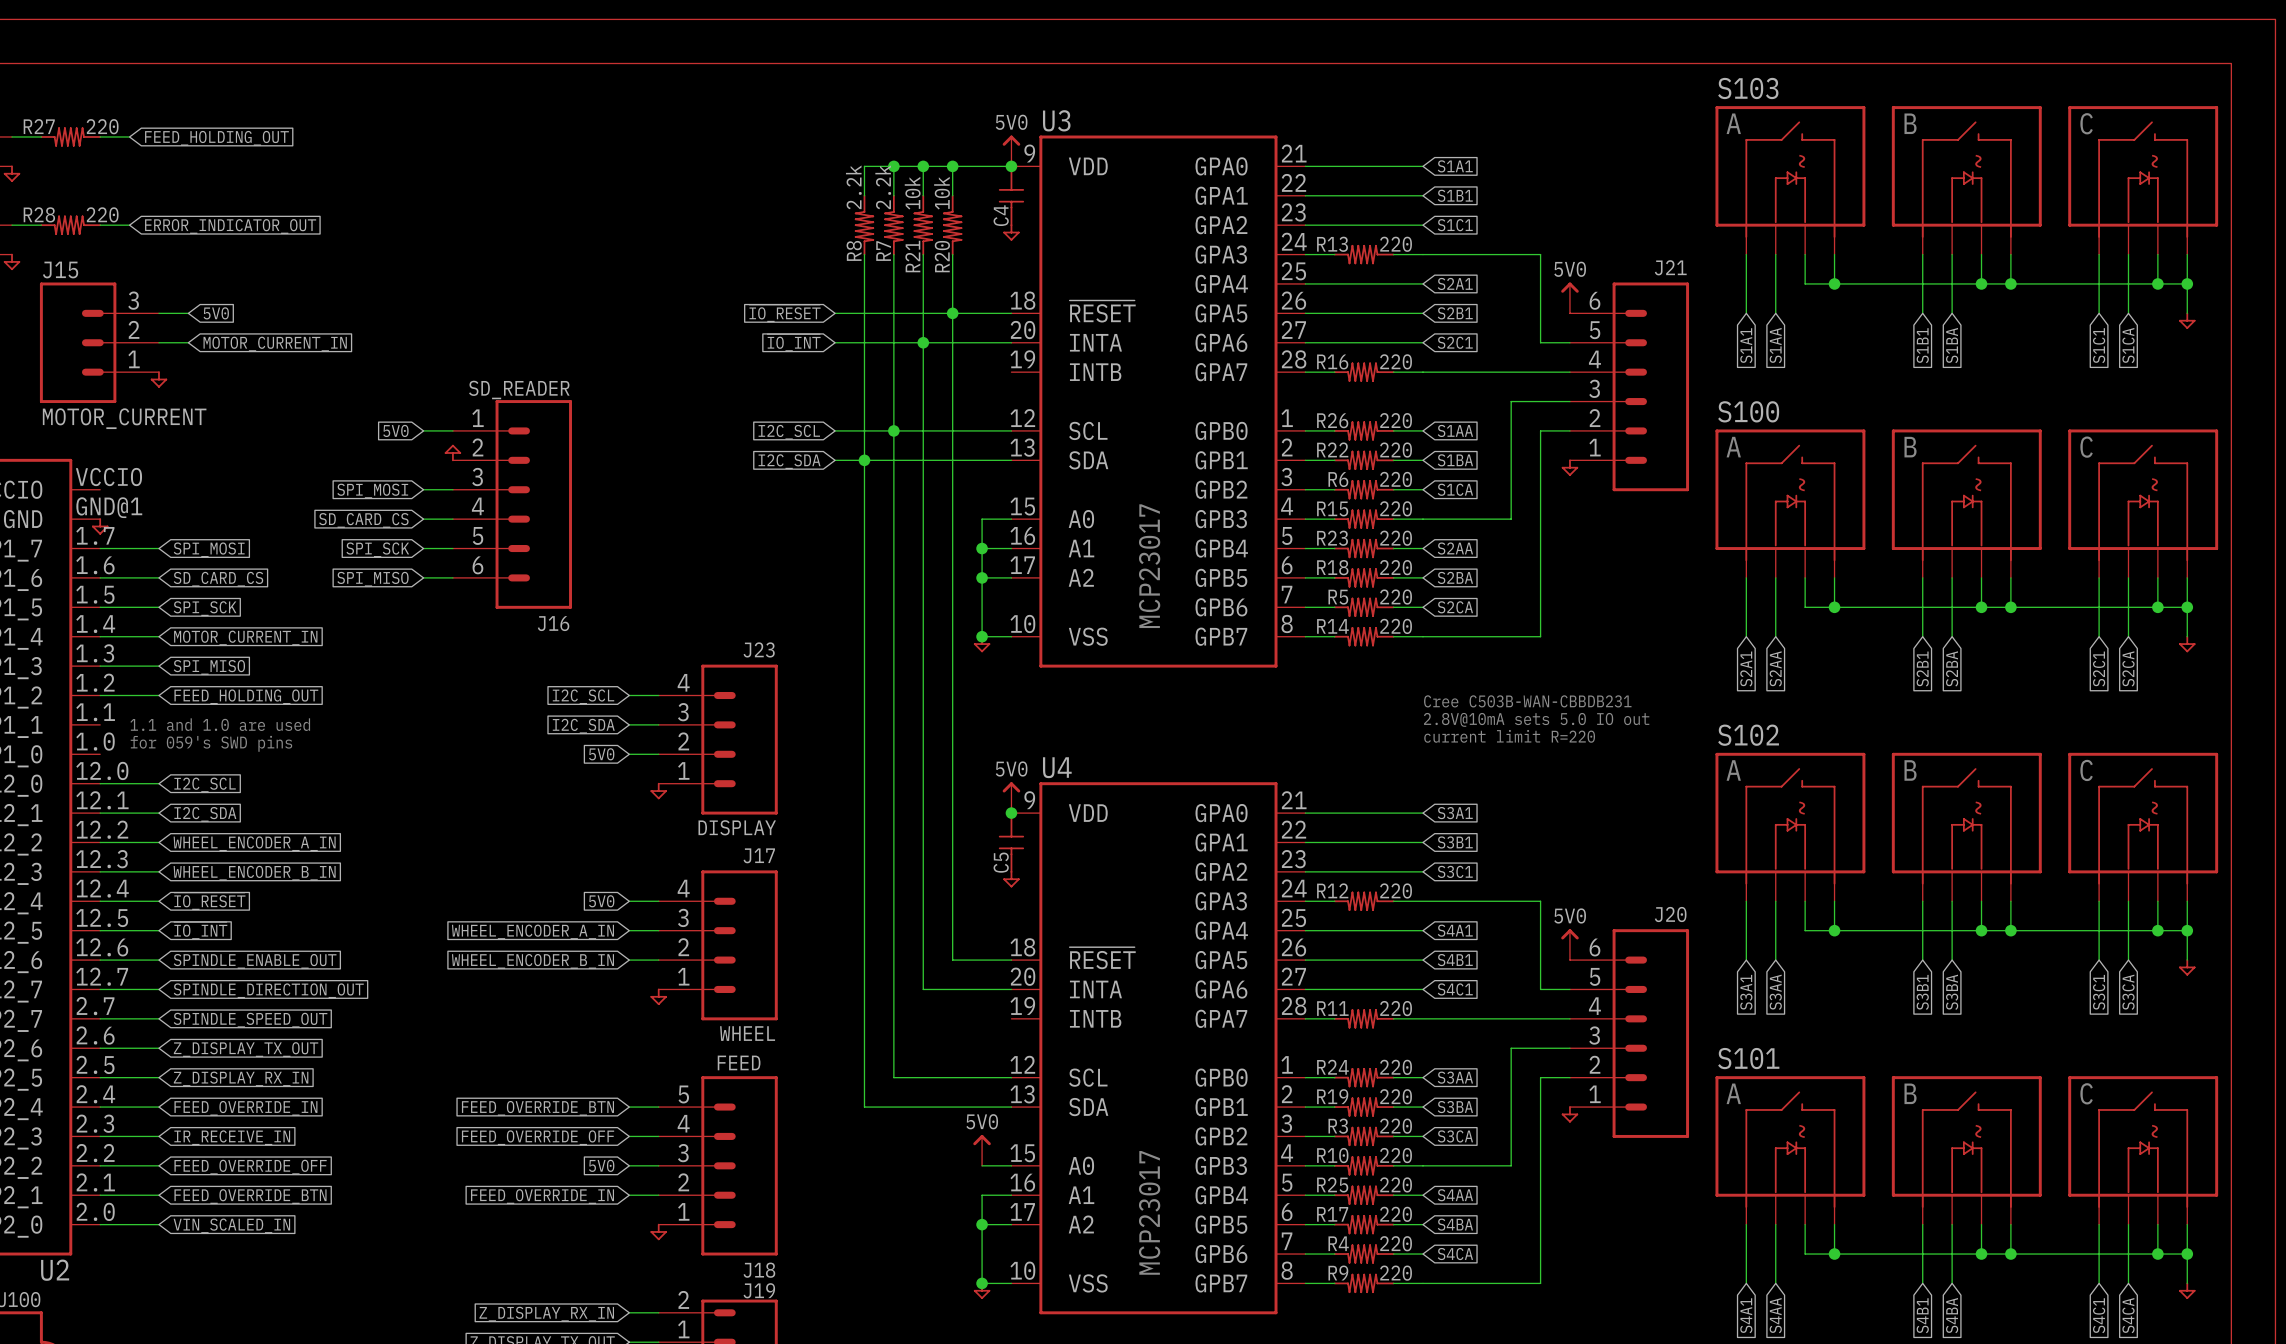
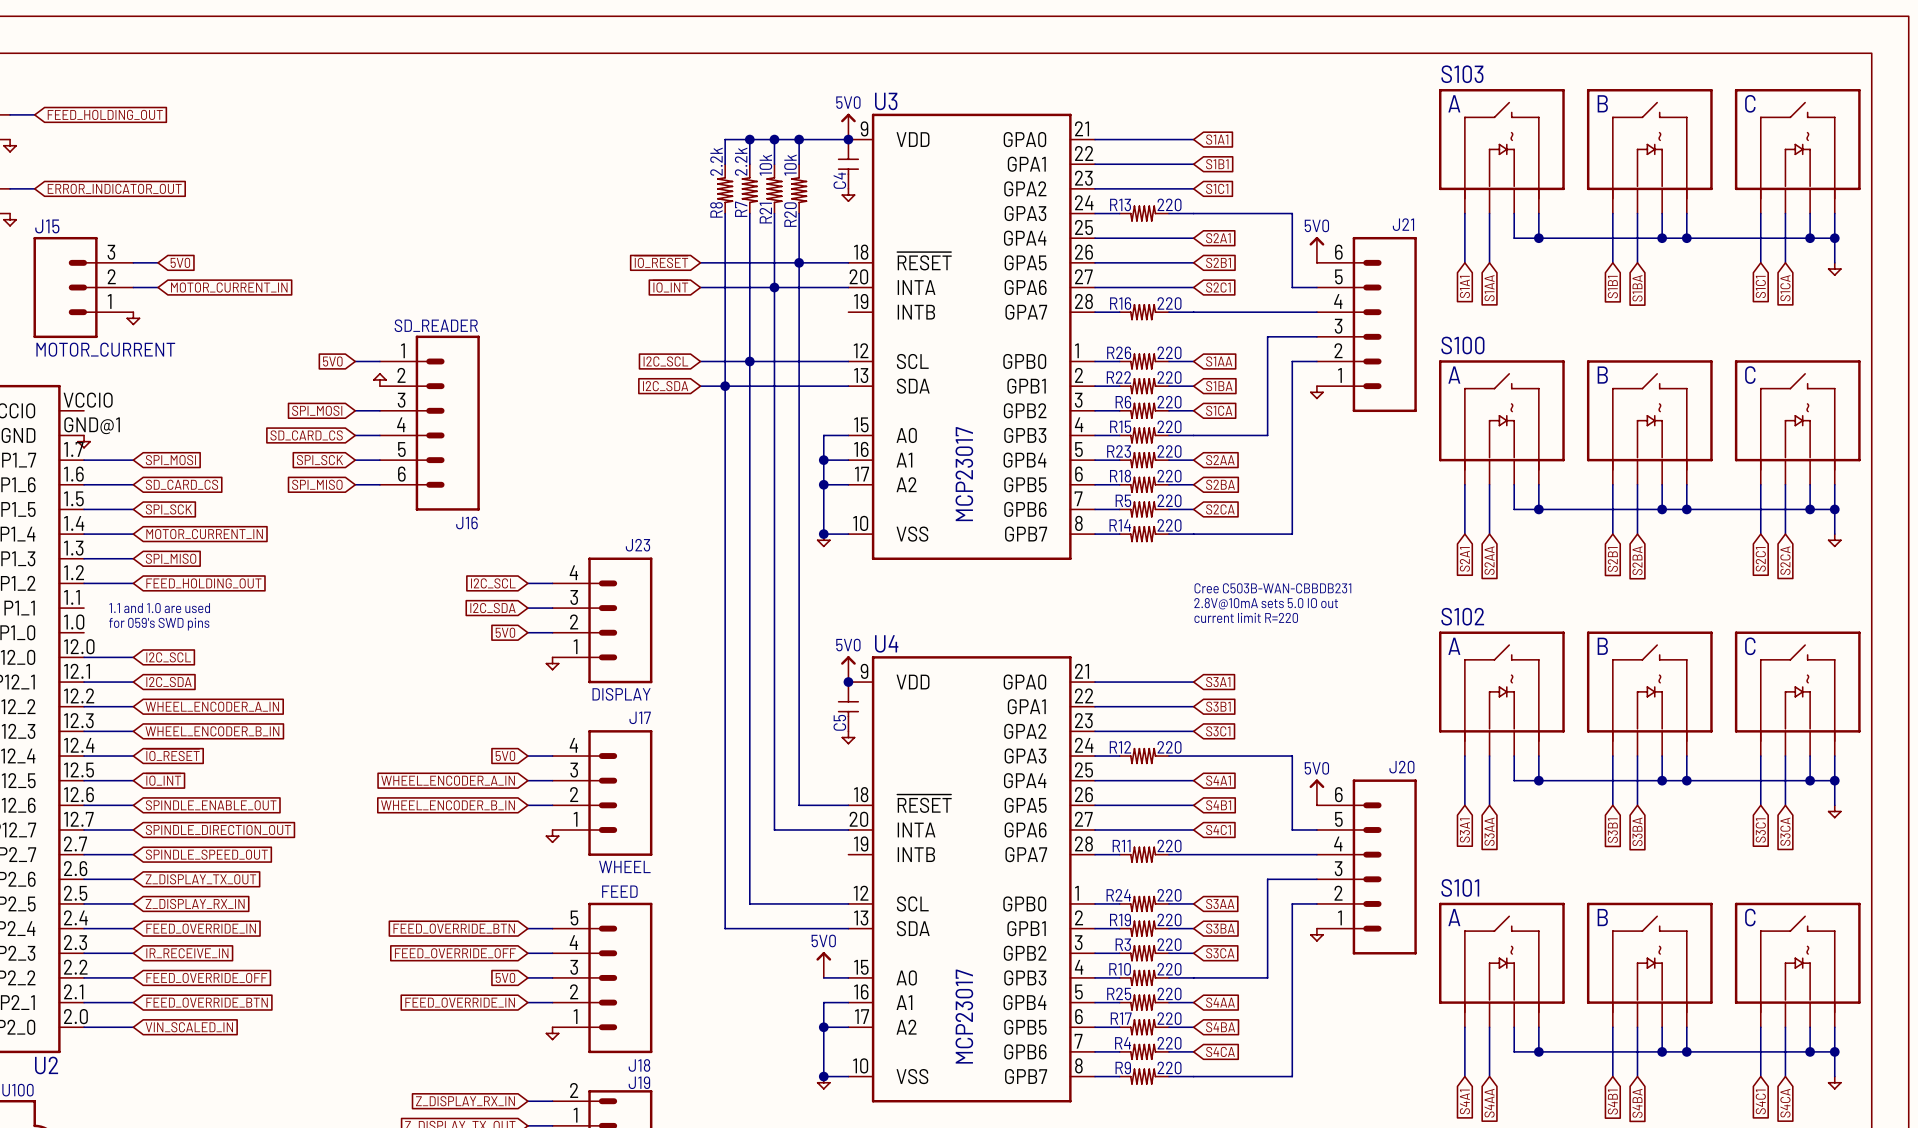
R27: 220 (70, 136) -> none
wire: (100, 136) (129, 136) -> none
global label position: FEED_HOLDING_OUT (216, 138) -> FEED_HOLDING_OUT (105, 114)
R28: 220 (70, 225) -> none
wire: (100, 225) (129, 225) -> none
global label position: ERROR_INDICATOR_OUT (230, 226) -> ERROR_INDICATOR_OUT (114, 188)

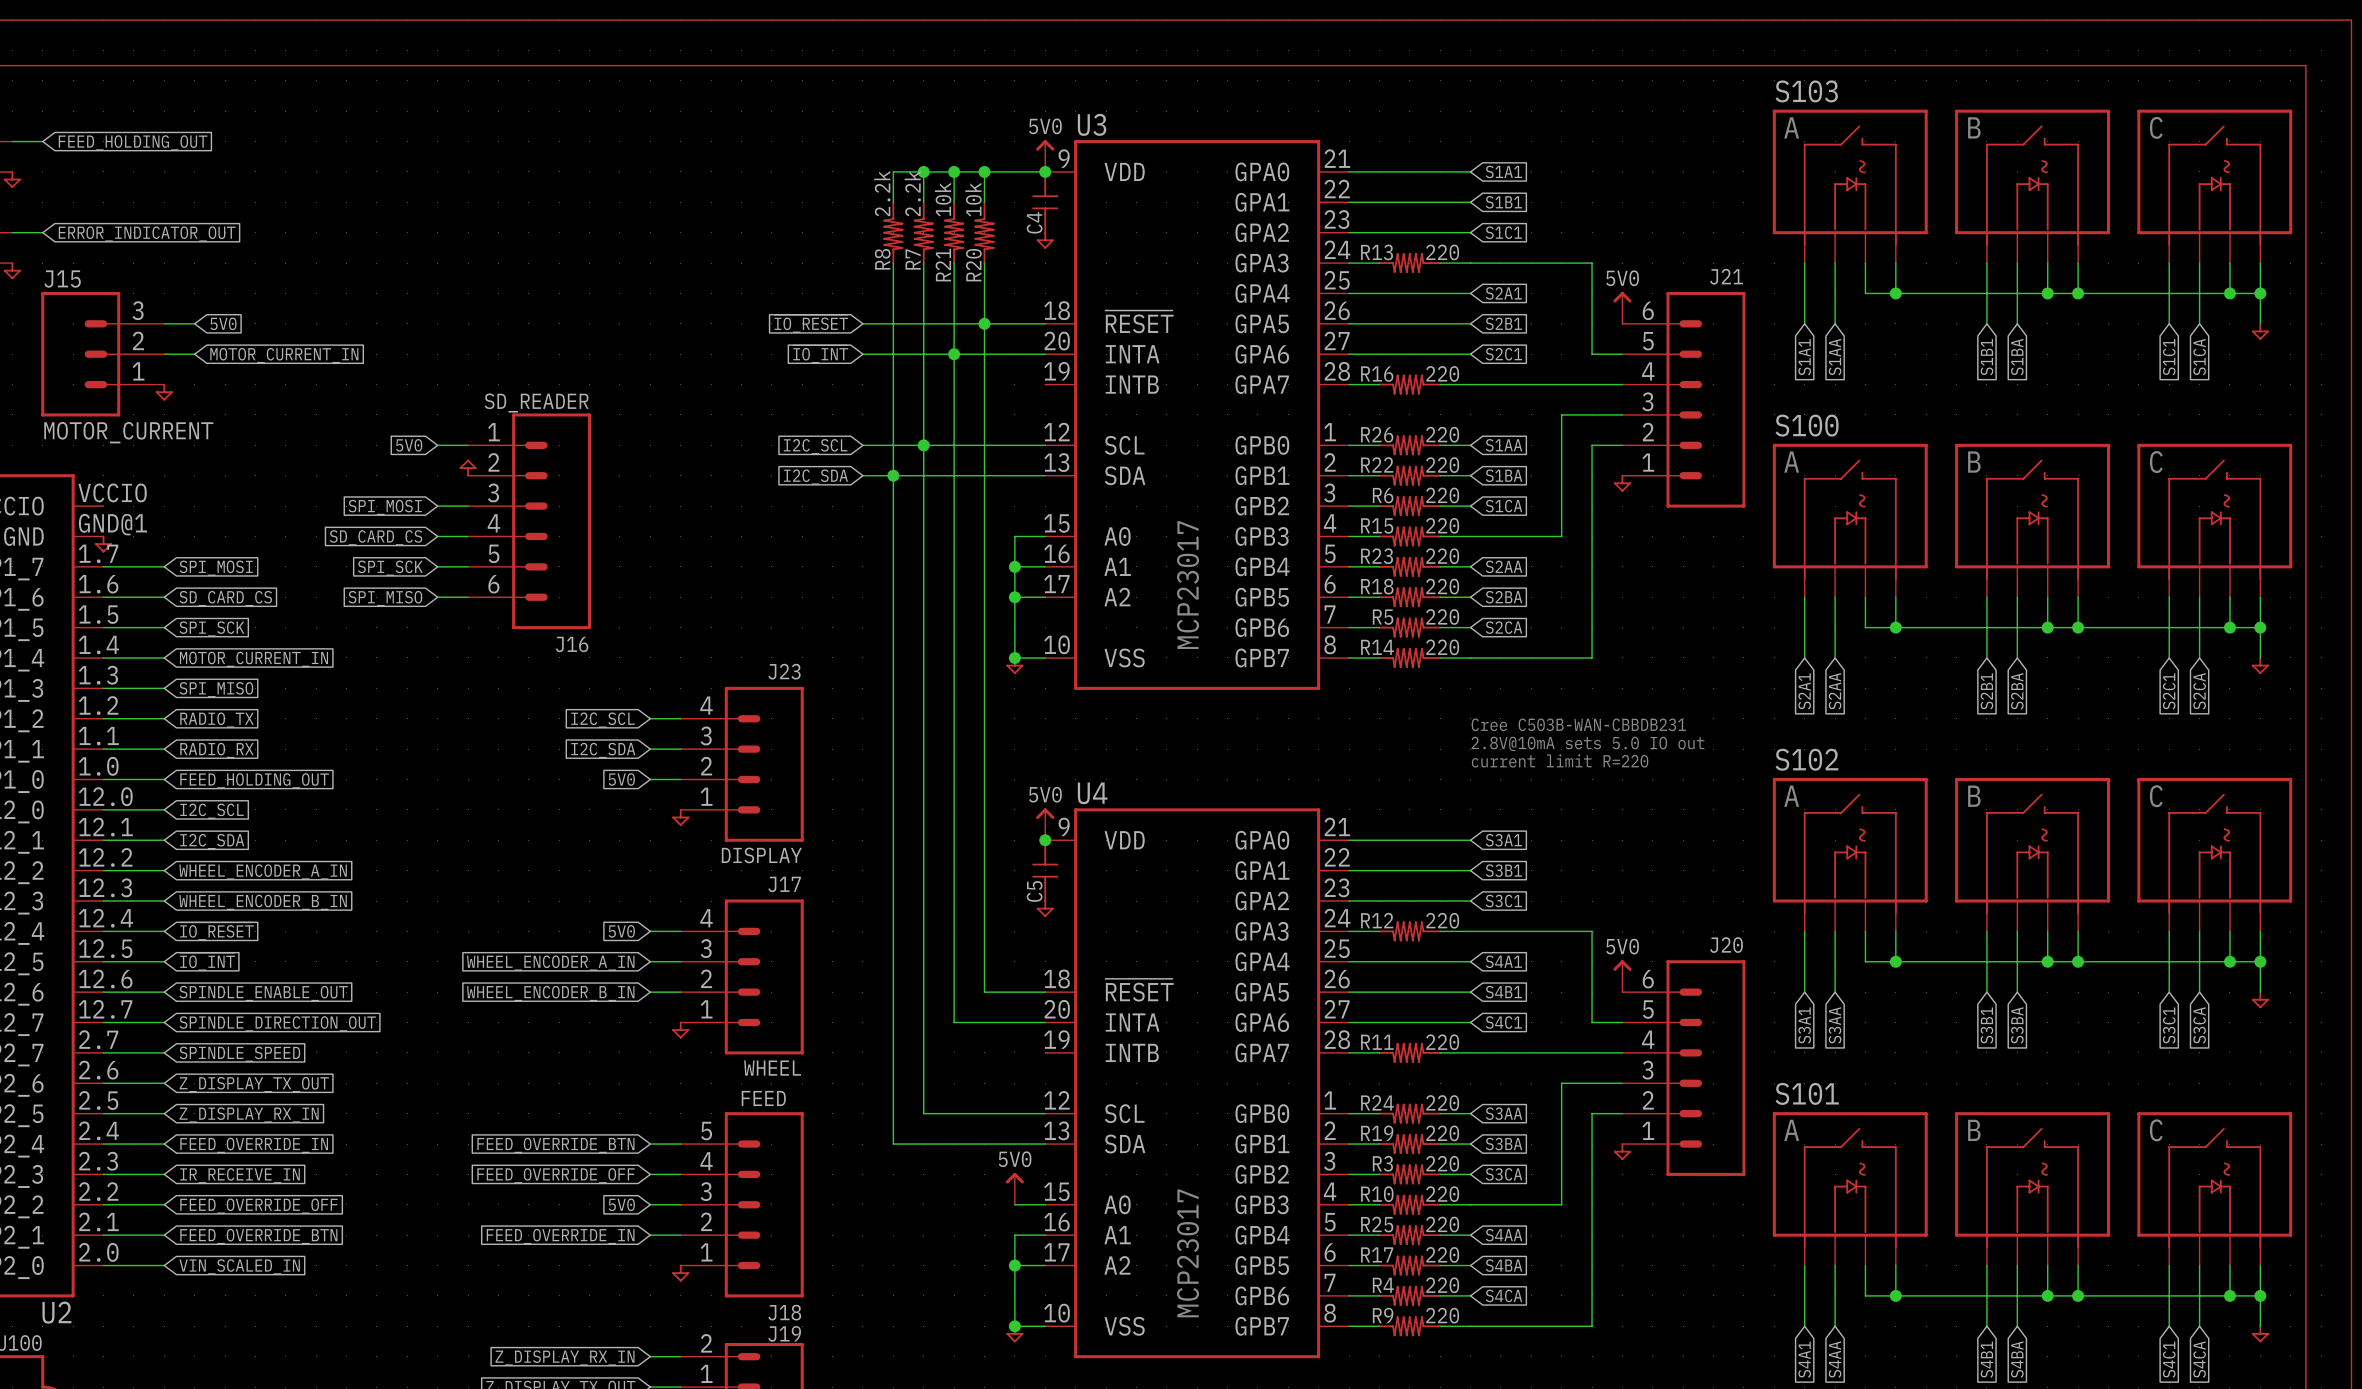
global label: FEED_HOLDING_OUT (203, 583) -> RADIO_TX (216, 720)
wire: none -> (103, 749) (164, 749)
text: 1.1 and 1.0 are used (159, 608) -> none
global label: none -> RADIO_RX (216, 750)
text: for 059's SWD pins (159, 624) -> none
wire: none -> (103, 779) (164, 779)
global label: none -> FEED_HOLDING_OUT (254, 780)
global label: SPINDLE_SPEED_OUT (206, 854) -> SPINDLE_SPEED (239, 1054)

